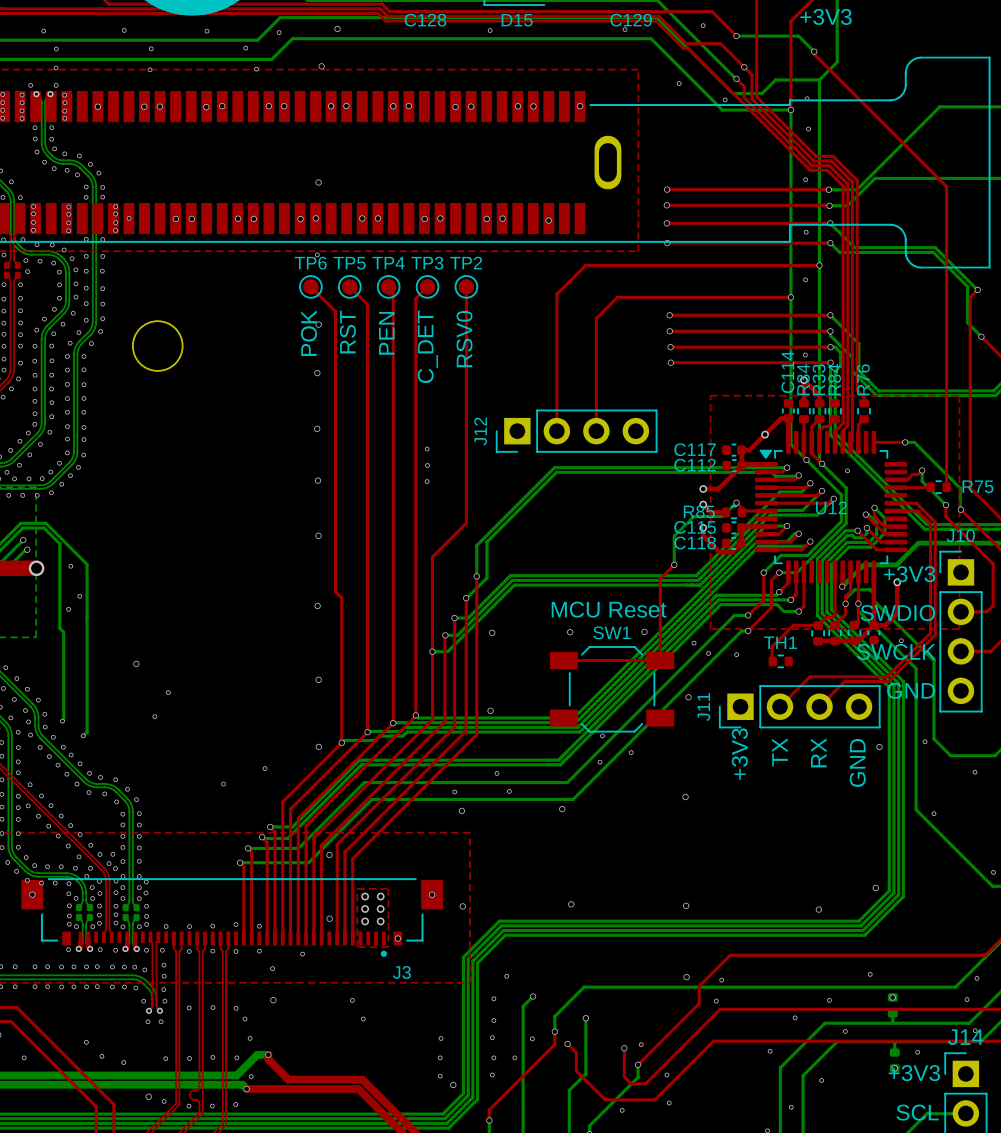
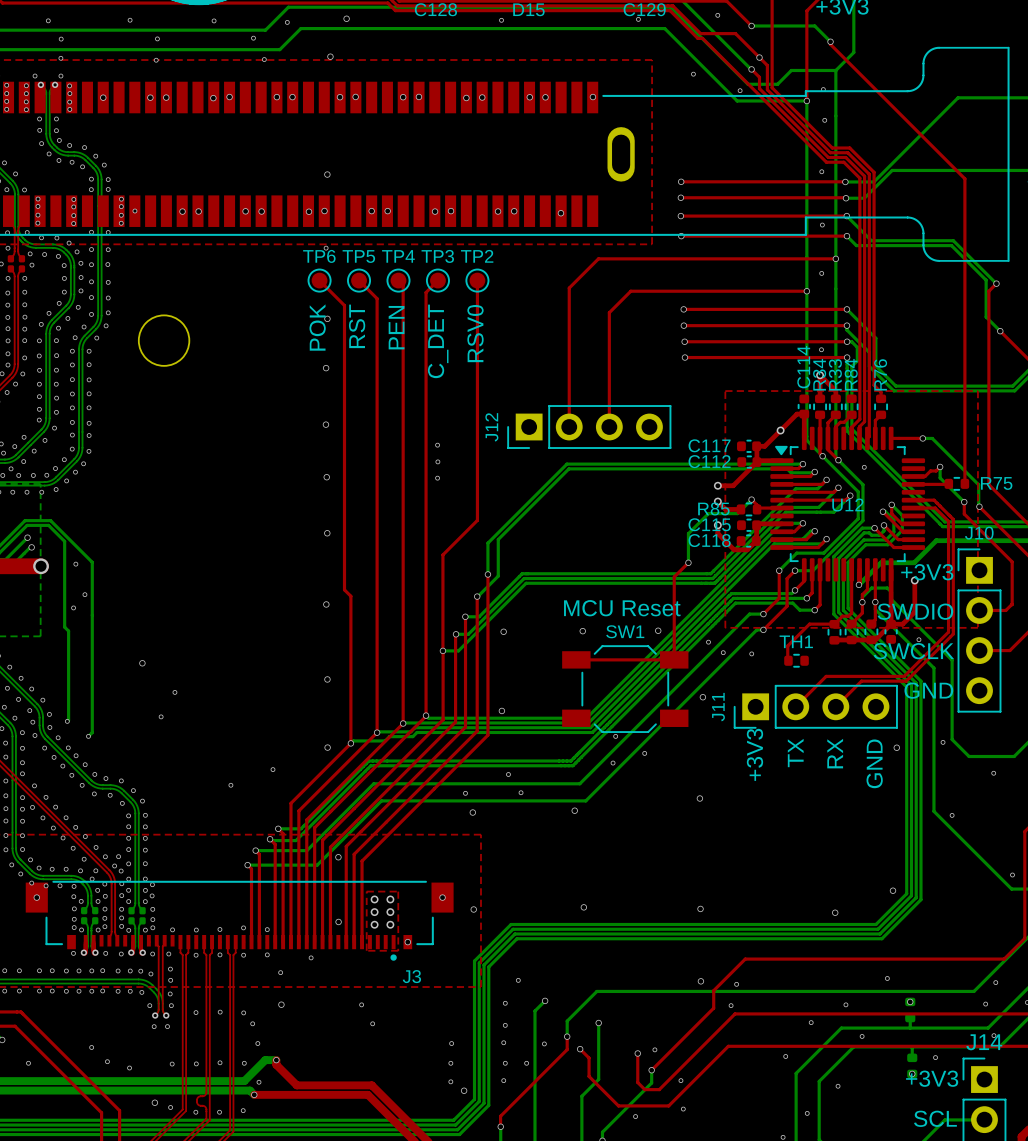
via: (28, 433) -> none

